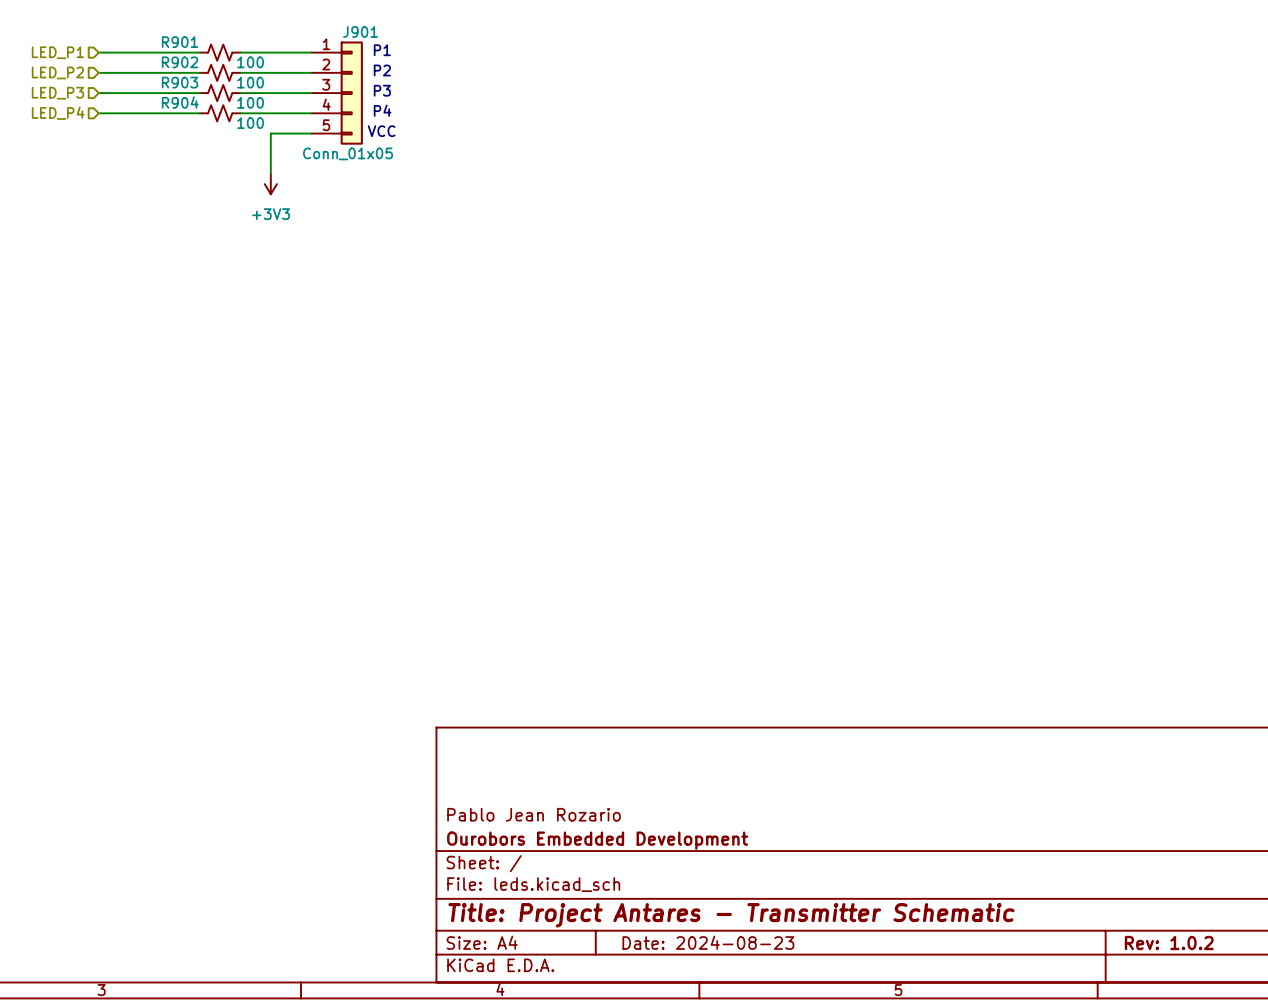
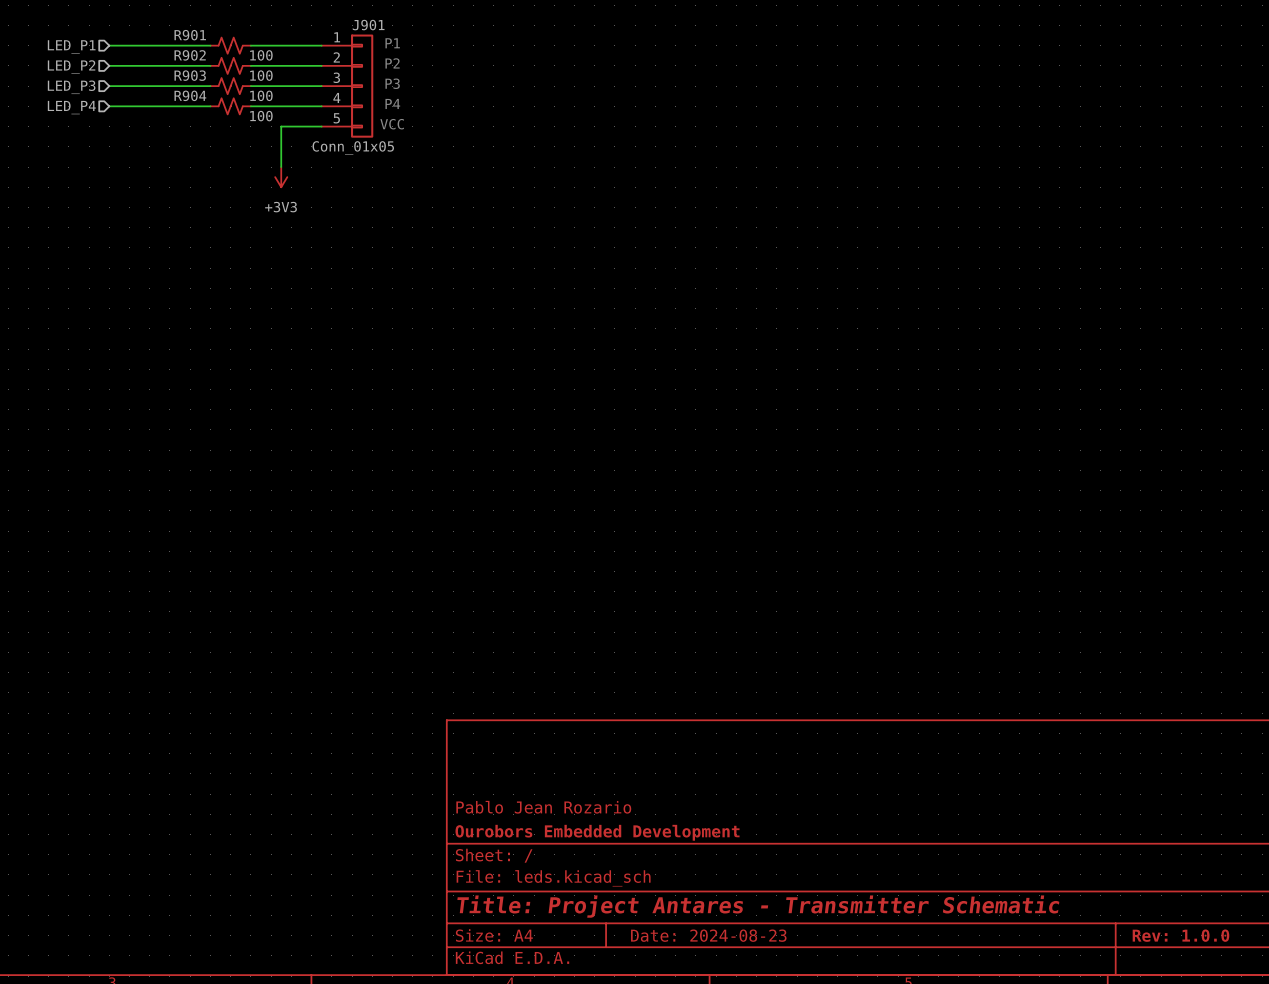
title block: Rev: 1.0.2 (1169, 943) -> Rev: 1.0.0 (1180, 935)

